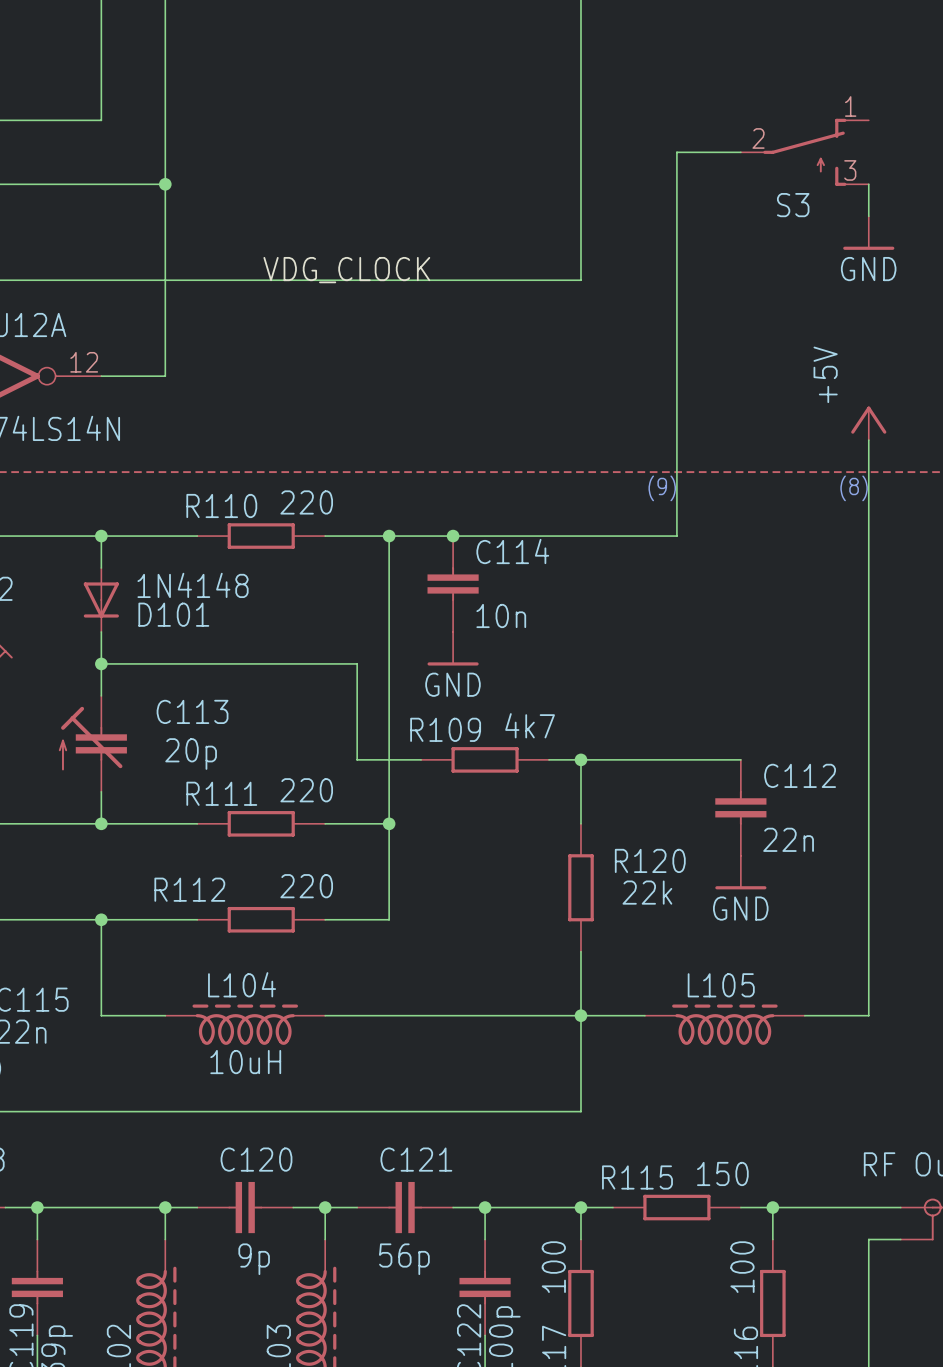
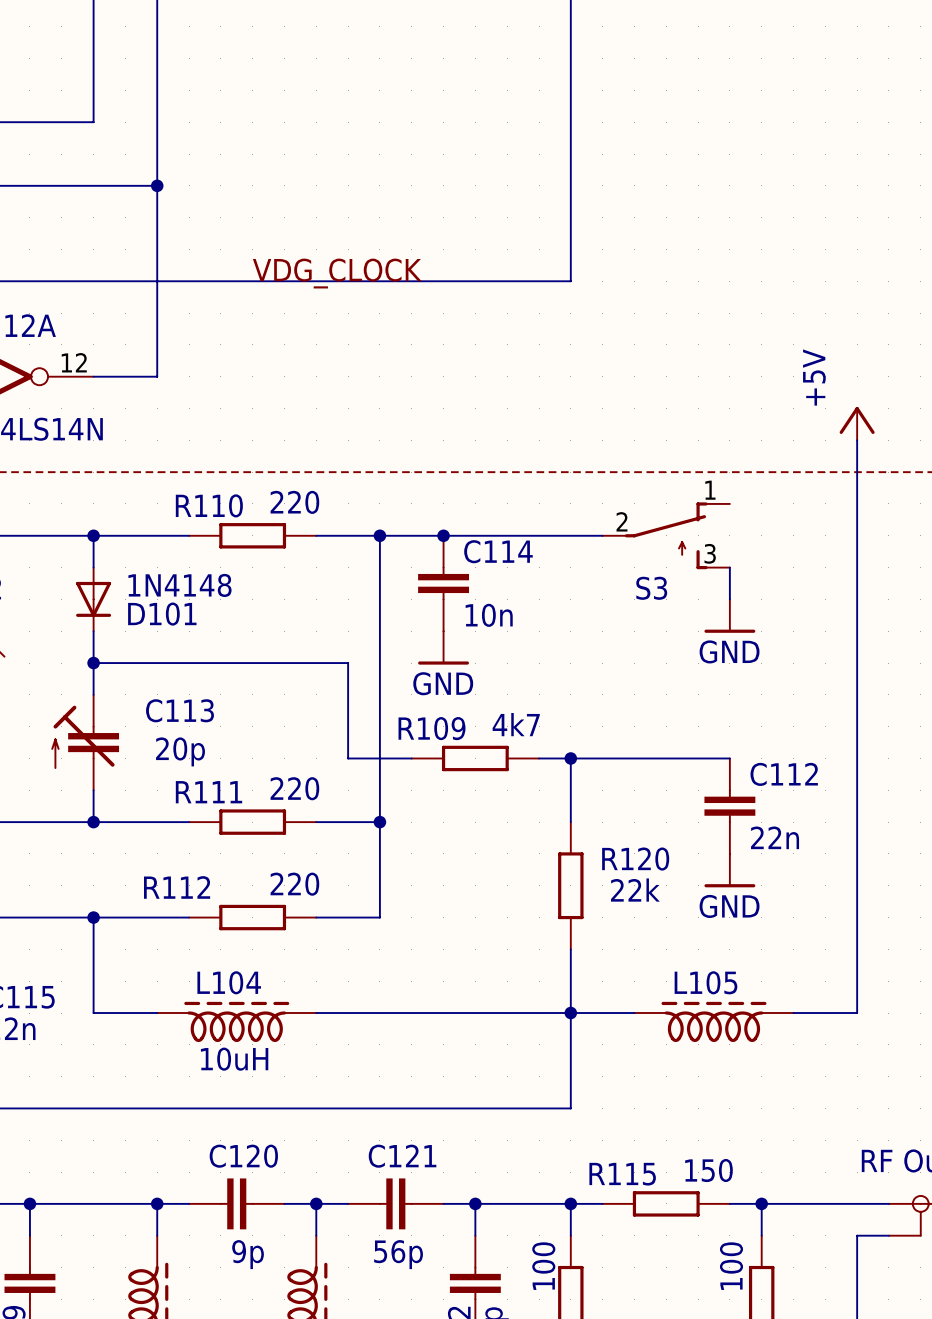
wire: (740, 152) (676, 152) (676, 536) (612, 536) -> none
S3 position: (804, 152) -> (666, 535)
wire: (868, 184) (868, 216) -> none
power symbol: GND (868, 233) -> none
text: (9) (662, 488) -> none
text: (8) (854, 488) -> none
wire: none -> (729, 567) (729, 599)
power symbol: none -> GND (729, 616)

